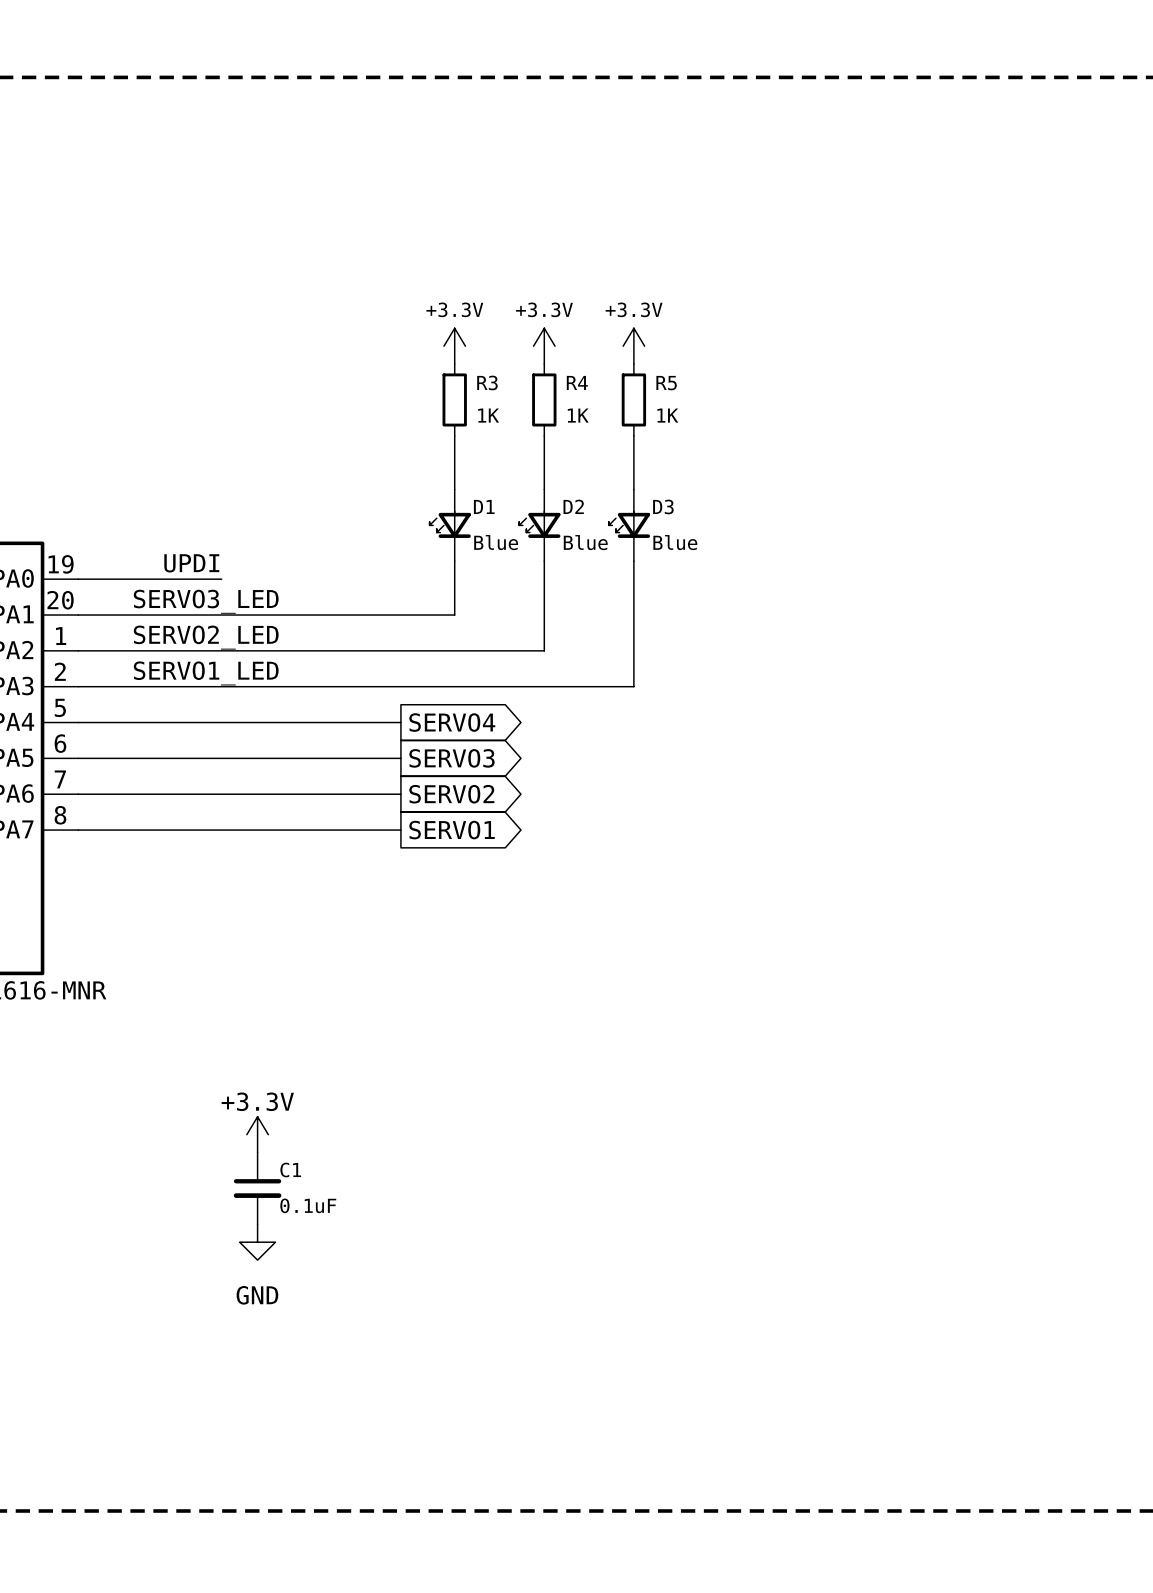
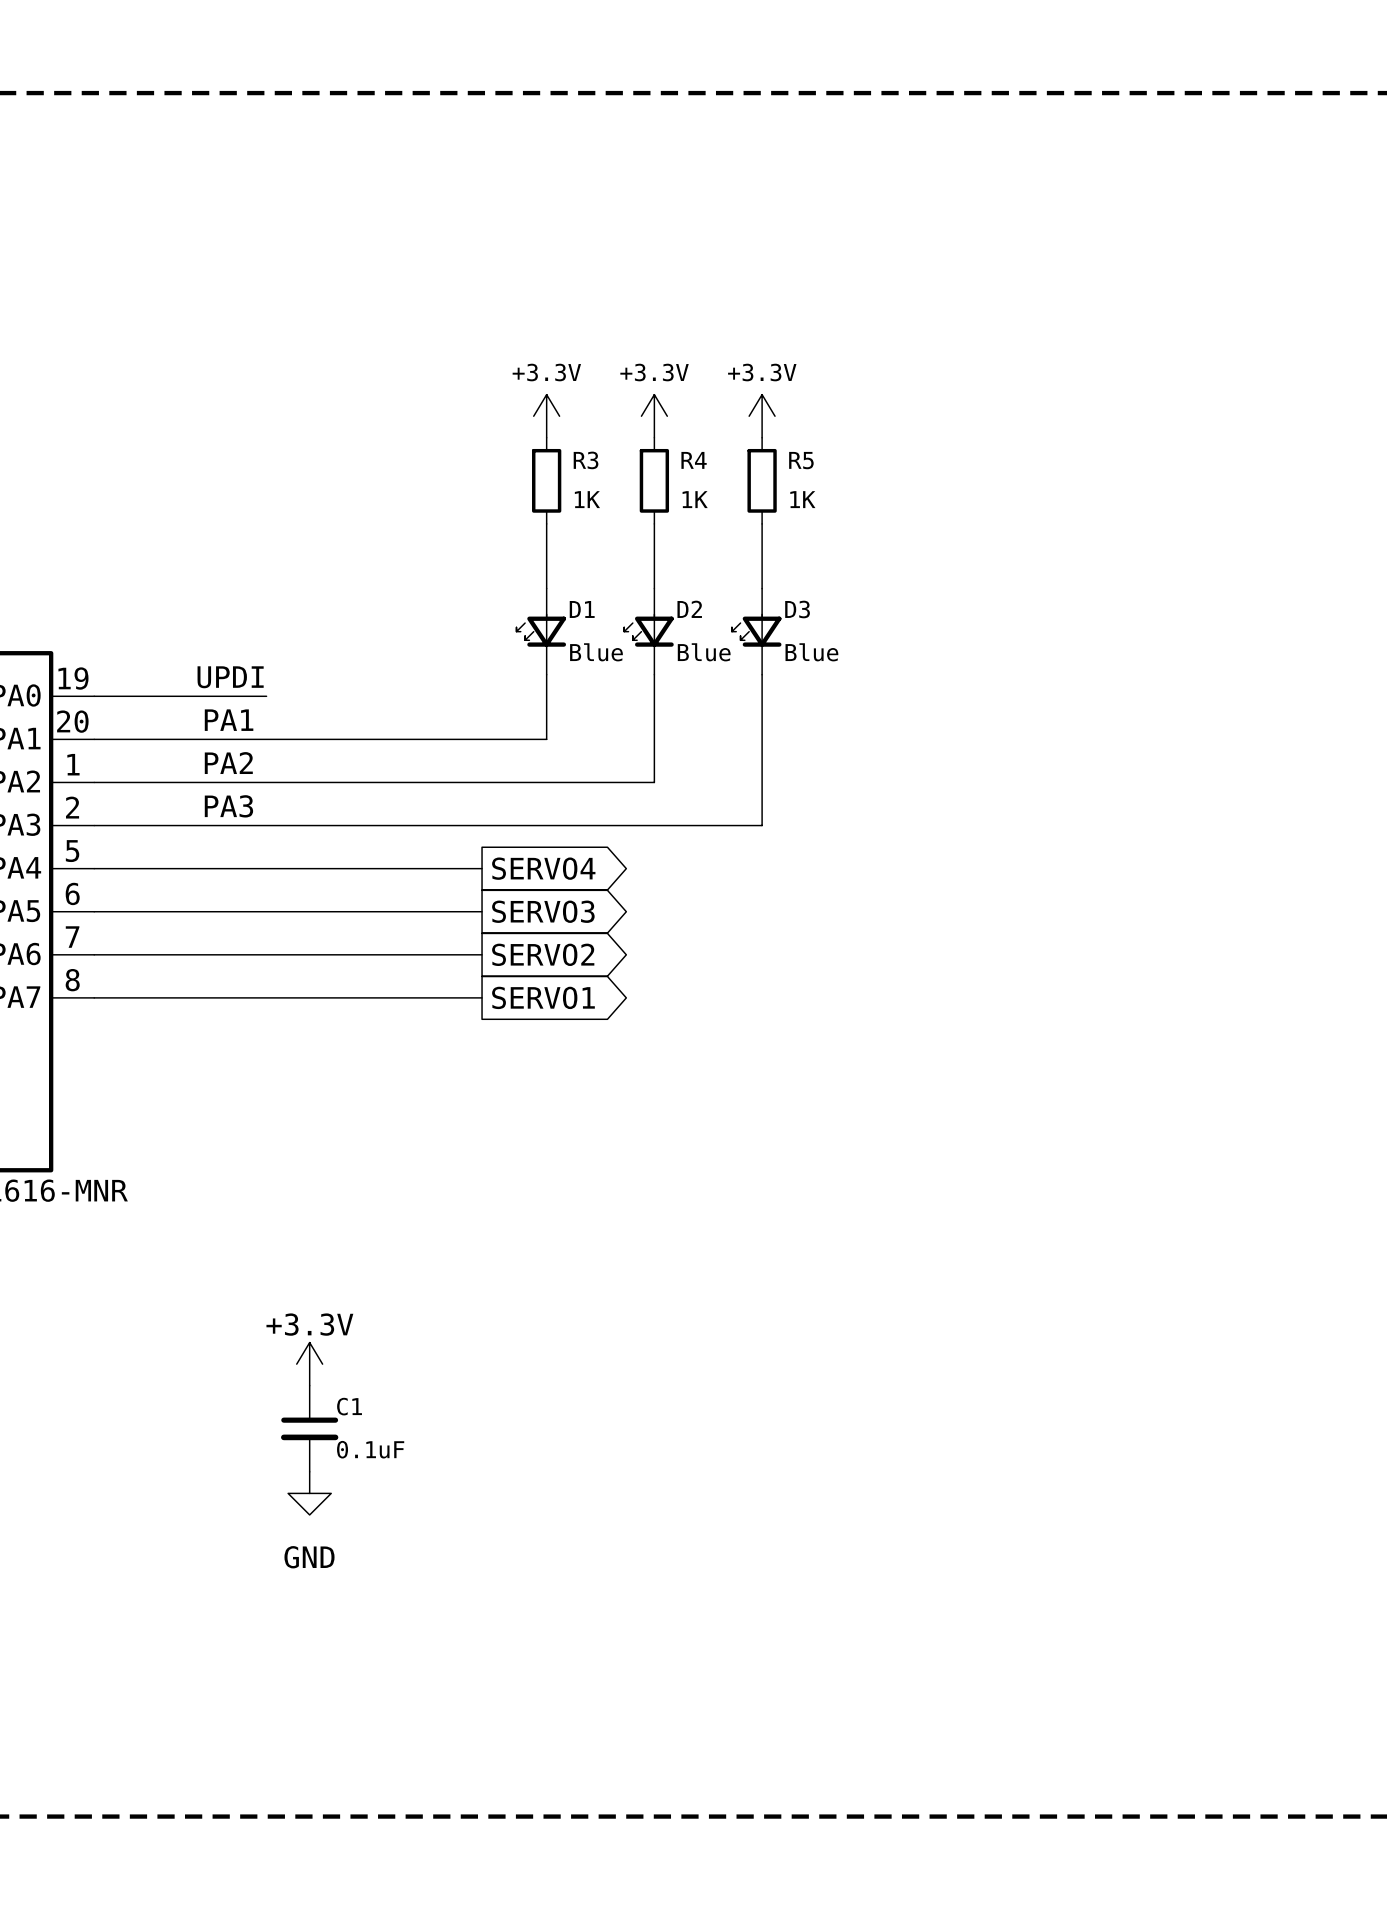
label: none -> PA1 (229, 720)
label: SERVO3_LED (206, 601) -> none
label: none -> PA2 (228, 763)
label: SERVO2_LED (206, 637) -> none
label: none -> PA3 (228, 806)
label: SERVO1_LED (206, 673) -> none

